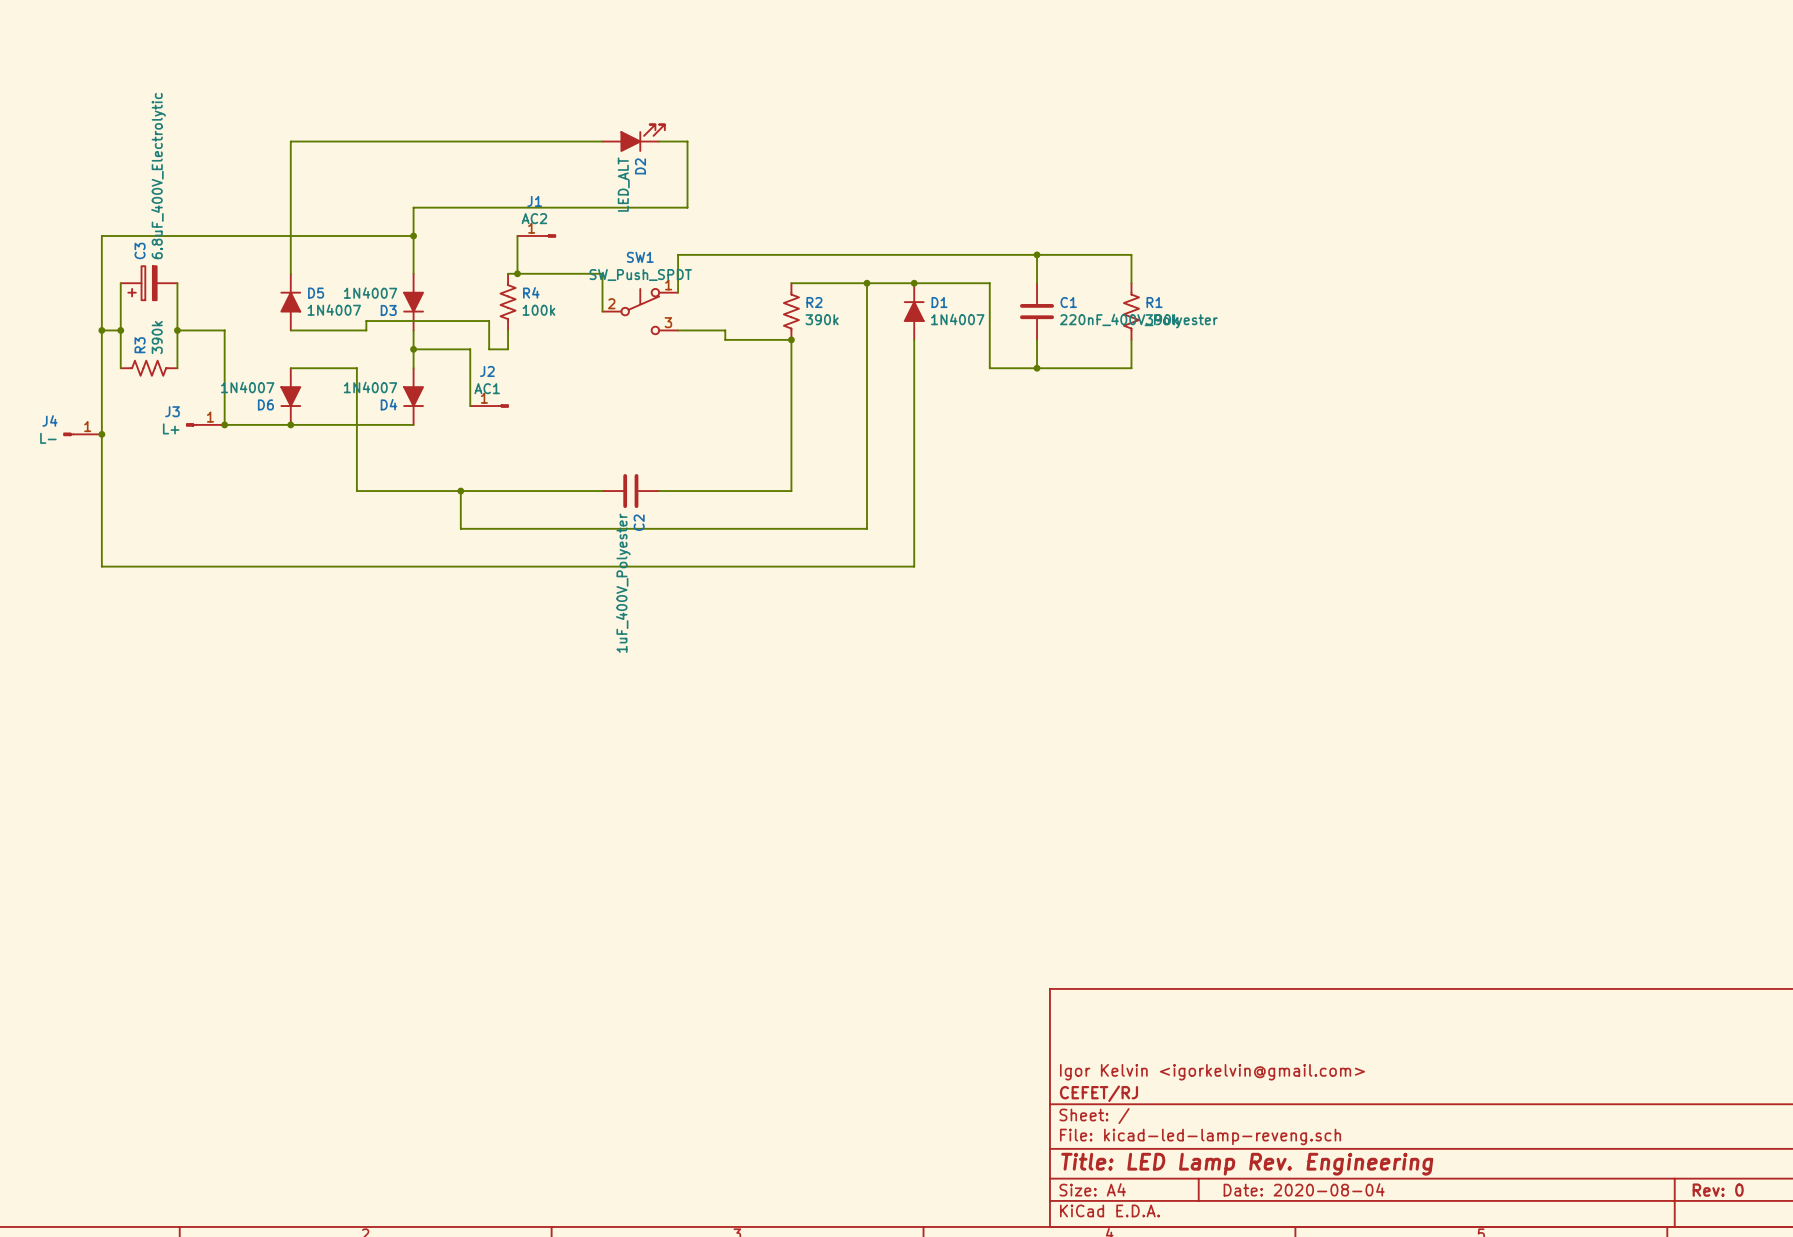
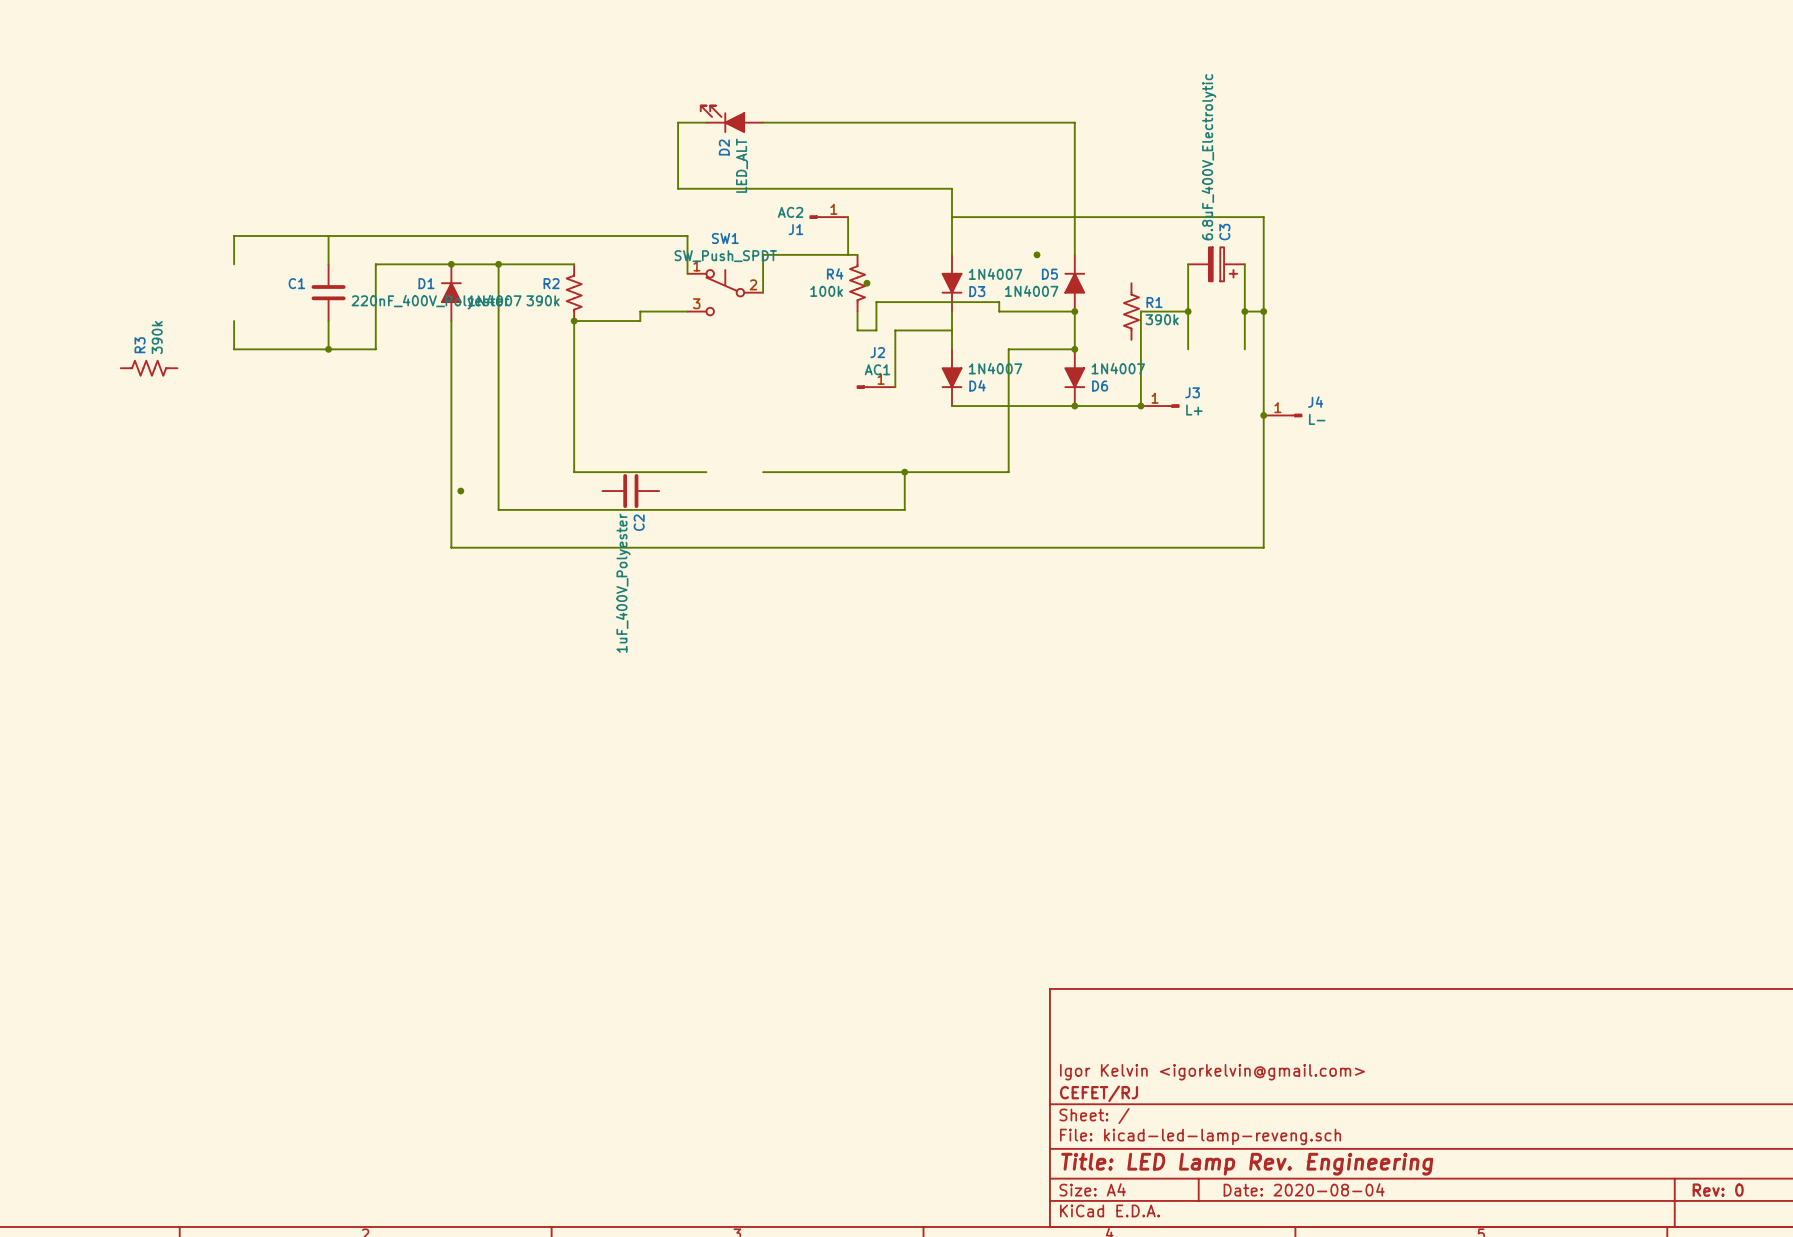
wire: none -> (706, 122) (678, 122) (678, 188) (952, 188) (952, 254)
wire: none -> (763, 122) (1074, 122) (1074, 254)
D2 position: (633, 138) -> (731, 119)
D2 flip: as is (642, 138) -> left-right (722, 119)
wire: (602, 141) (290, 141) (290, 273) -> none
wire: (659, 141) (687, 141) (687, 207) (413, 207) (413, 273) -> none
J1 name position: J1 (534, 201) -> J1 (795, 229)
wire: none -> (848, 217) (848, 254)
wire: none -> (952, 217) (1263, 217) (1263, 547) (451, 547) (451, 321)
J1 value position: AC2 (534, 218) -> AC2 (790, 212)
wire: (234, 235) (101, 235) (101, 566) (914, 566) (914, 339) -> (234, 235) (234, 264)
wire: none -> (328, 235) (328, 264)
wire: none -> (413, 235) (687, 235) (687, 273)
junction: (413, 235) -> none
wire: (517, 235) (517, 273) -> none
J1 position: (536, 235) -> (828, 217)
J1 rotation: 0° (550, 235) -> 180° (815, 217)
wire: (763, 254) (678, 254) (678, 292) -> (763, 254) (763, 292)
wire: (857, 254) (1131, 254) (1131, 283) -> none
wire: (1037, 254) (1037, 283) -> none
junction: none -> (451, 264)
wire: none -> (498, 264) (498, 509) (904, 509) (904, 472)
wire: none -> (574, 264) (375, 264) (375, 349) (234, 349) (234, 321)
wire: none -> (1188, 264) (1188, 349)
wire: none -> (1244, 264) (1244, 349)
wire: (508, 273) (602, 273) (602, 311) -> none
junction position: (517, 273) -> (498, 264)
wire: (120, 283) (120, 368) -> none
C3 flip: as is (142, 283) -> left-right (1223, 264)
C3 position: (149, 283) -> (1216, 264)
wire: (177, 283) (177, 368) -> none
wire: (791, 283) (989, 283) (989, 368) (1131, 368) (1131, 339) -> none
wire: (866, 283) (866, 528) (460, 528) (460, 491) -> none
junction: (914, 283) -> none
D5 name position: D5 (316, 293) -> D5 (1049, 274)
D3 value position: 1N4007 (370, 293) -> 1N4007 (995, 274)
D5 position: (290, 302) -> (1074, 283)
D3 position: (413, 302) -> (952, 283)
R4 flip: as is (508, 302) -> left-right (857, 283)
R4 position: (508, 302) -> (857, 283)
D1 name position: D1 (939, 302) -> D1 (426, 283)
C1 name position: C1 (1068, 302) -> C1 (296, 283)
D5 value position: 1N4007 (334, 310) -> 1N4007 (1031, 291)
D3 name position: D3 (388, 310) -> D3 (977, 291)
SW1 flip: as is (640, 311) -> left-right (725, 292)
SW1 position: (640, 311) -> (725, 292)
wire: none -> (687, 311) (640, 311) (640, 321) (574, 321) (574, 472) (706, 472)
R2 flip: as is (791, 311) -> left-right (574, 292)
R2 position: (791, 311) -> (574, 292)
wire: none -> (857, 311) (857, 330) (876, 330) (876, 302) (999, 302) (999, 311) (1074, 311) (1074, 349) (1008, 349) (1008, 472) (763, 472)
D1 position: (914, 311) -> (451, 292)
wire: none -> (952, 311) (952, 349)
C1 position: (1037, 311) -> (328, 292)
junction: none -> (1074, 311)
wire: none -> (1188, 311) (1140, 311) (1140, 406) (952, 406)
junction: none -> (1188, 311)
wire: none -> (1244, 311) (1263, 311)
junction: none -> (1244, 311)
junction: none -> (1263, 311)
wire: none -> (328, 321) (328, 349)
junction: none -> (574, 321)
wire: (101, 330) (120, 330) -> none
junction: (101, 330) -> none
junction: (120, 330) -> none
wire: (177, 330) (224, 330) (224, 424) (413, 424) -> none
junction: (177, 330) -> none
wire: (290, 330) (366, 330) (366, 321) (489, 321) (489, 349) (508, 349) (508, 330) -> none
wire: (413, 330) (413, 368) -> none
wire: (678, 330) (725, 330) (725, 339) (791, 339) (791, 491) (659, 491) -> none
wire: none -> (952, 330) (895, 330) (895, 387)
junction: (791, 339) -> none
wire: (1037, 339) (1037, 368) -> none
junction: none -> (328, 349)
wire: (413, 349) (470, 349) (470, 406) -> none
junction: (413, 349) -> none
junction: none -> (1074, 349)
wire: (290, 368) (356, 368) (356, 491) (602, 491) -> none
junction: (1037, 368) -> none
D6 value position: 1N4007 (247, 387) -> 1N4007 (1118, 368)
D4 value position: 1N4007 (370, 387) -> 1N4007 (995, 368)
D6 position: (290, 396) -> (1074, 377)
D4 position: (413, 396) -> (952, 377)
D6 name position: D6 (265, 404) -> D6 (1100, 386)
D4 name position: D4 (388, 404) -> D4 (977, 385)
J2 position: (489, 406) -> (876, 387)
J2 rotation: 0° (503, 406) -> 180° (862, 387)
junction: none -> (1074, 406)
junction: none -> (1140, 406)
J3 name position: J3 (172, 411) -> J3 (1192, 392)
junction: none -> (1263, 415)
J4 name position: J4 (49, 420) -> J4 (1315, 402)
J3 rotation: 0° (191, 424) -> 180° (1173, 406)
J3 position: (205, 424) -> (1160, 406)
junction: (224, 424) -> none
junction: (290, 424) -> none
J4 rotation: 0° (68, 434) -> 180° (1296, 415)
J4 position: (82, 434) -> (1282, 415)
junction: (101, 434) -> none
junction: none -> (904, 472)

